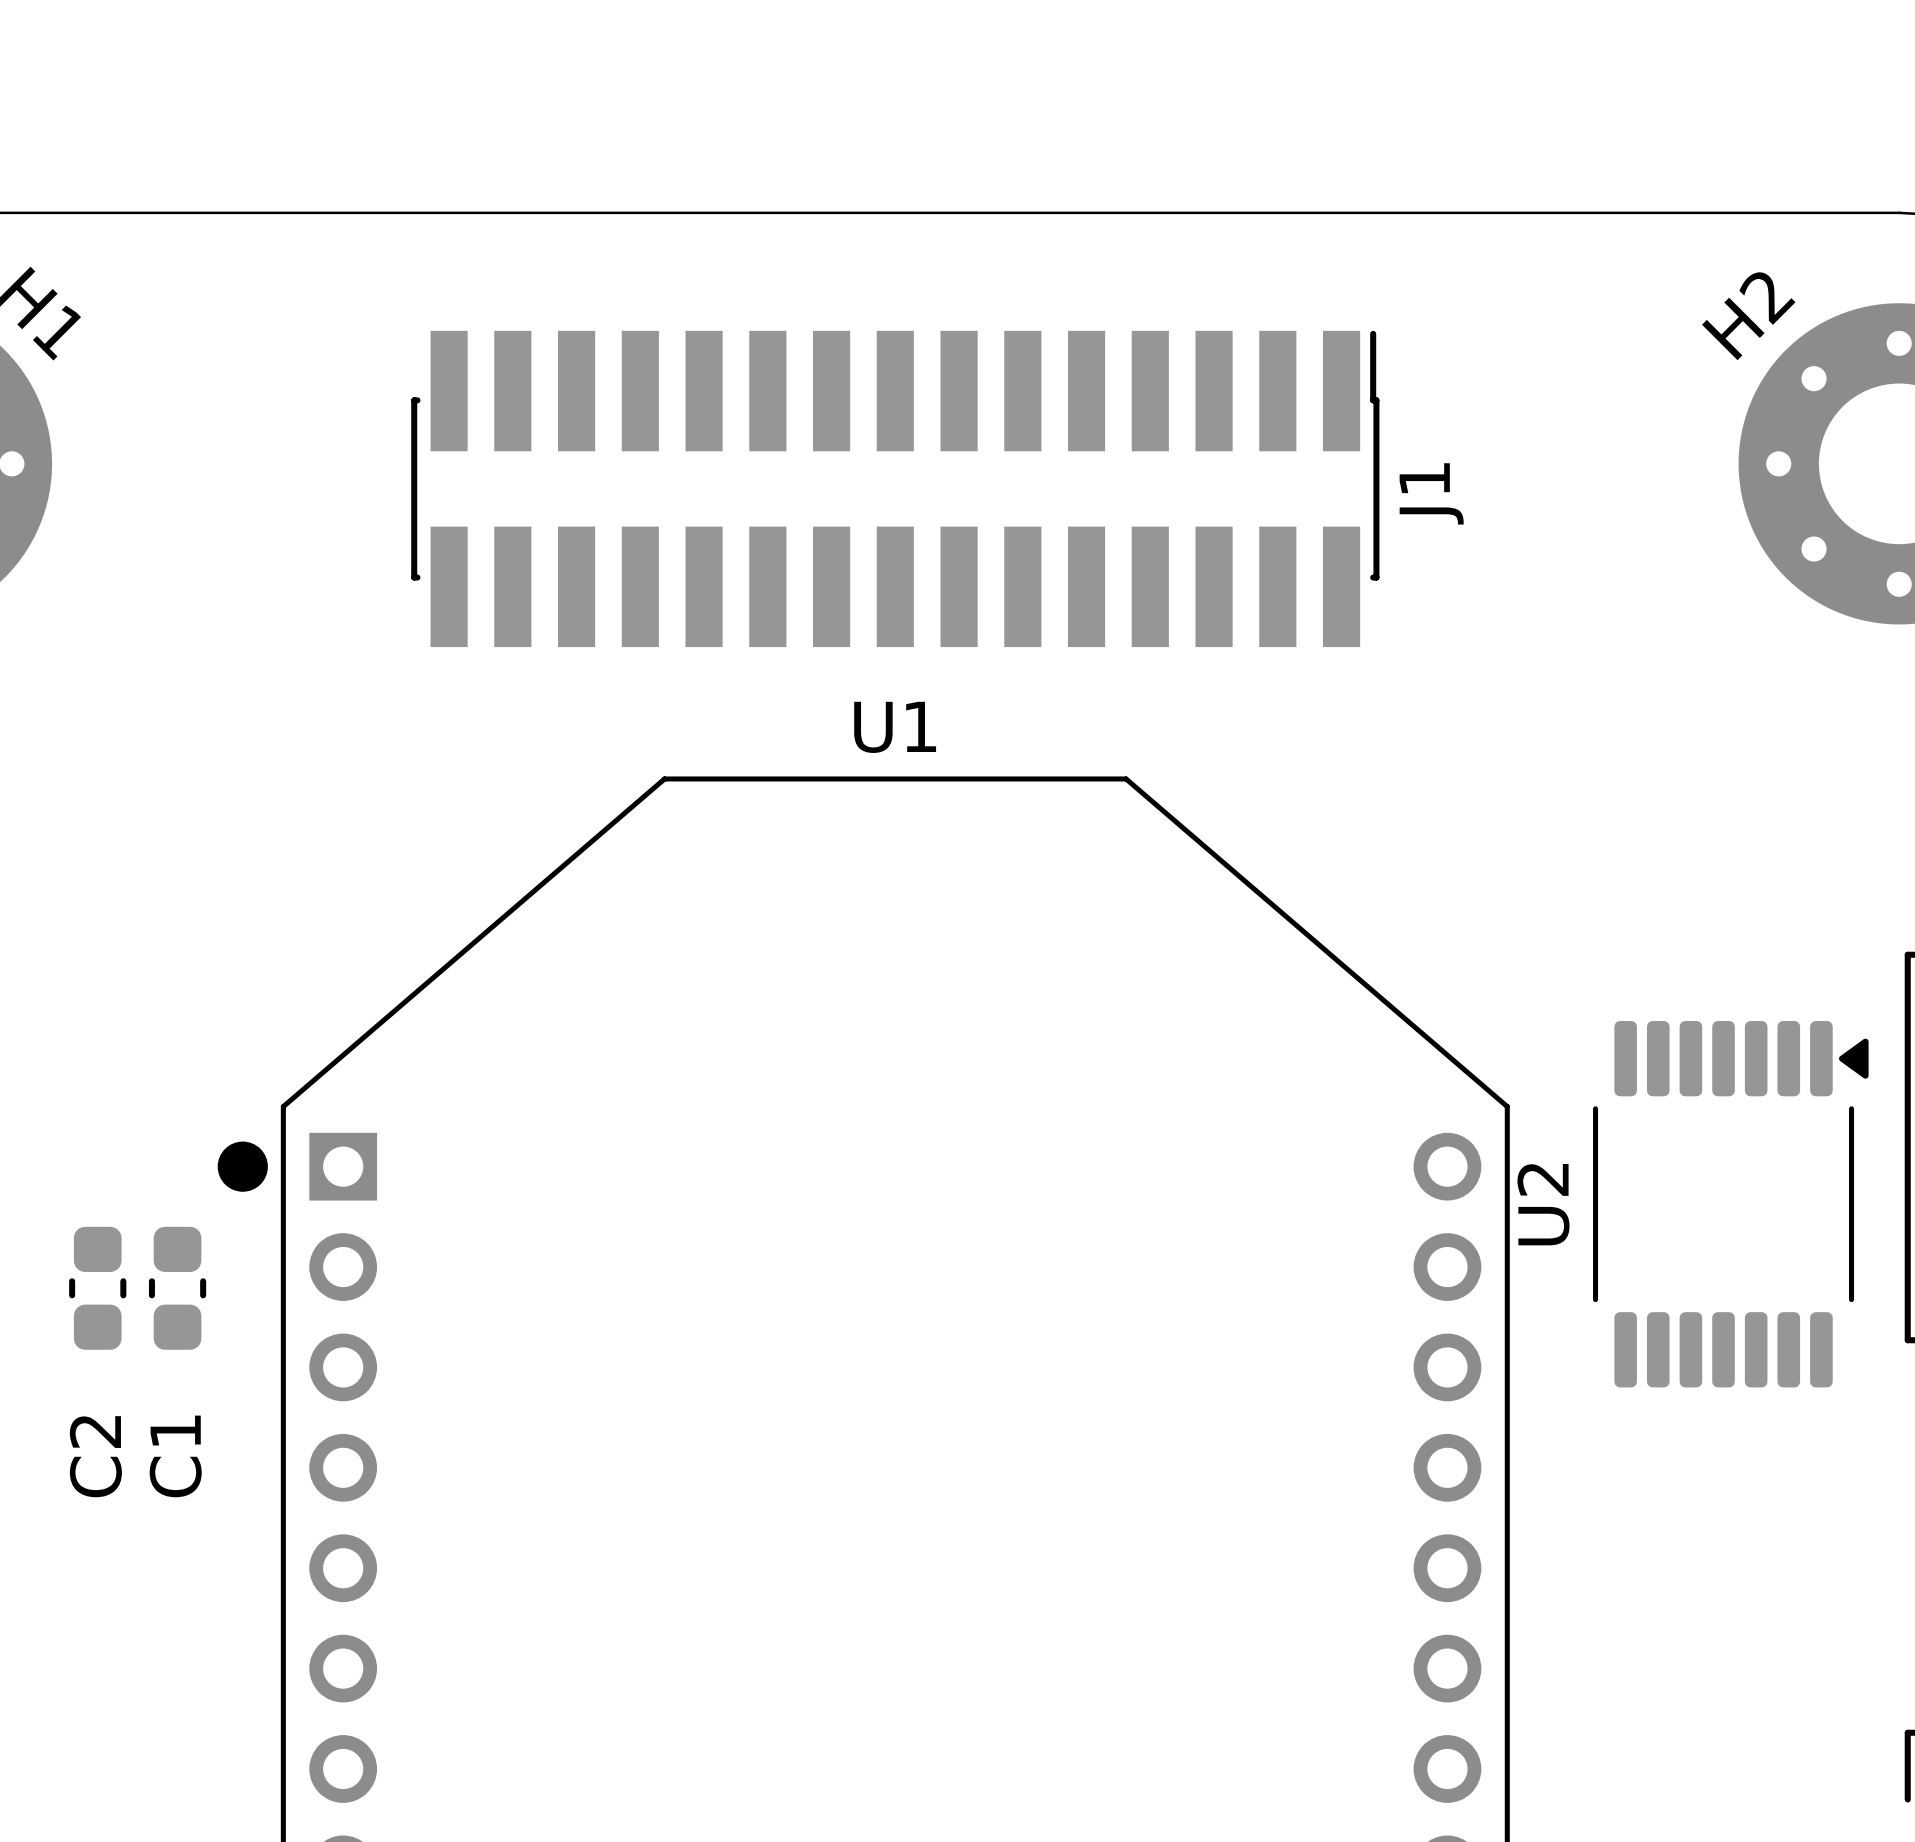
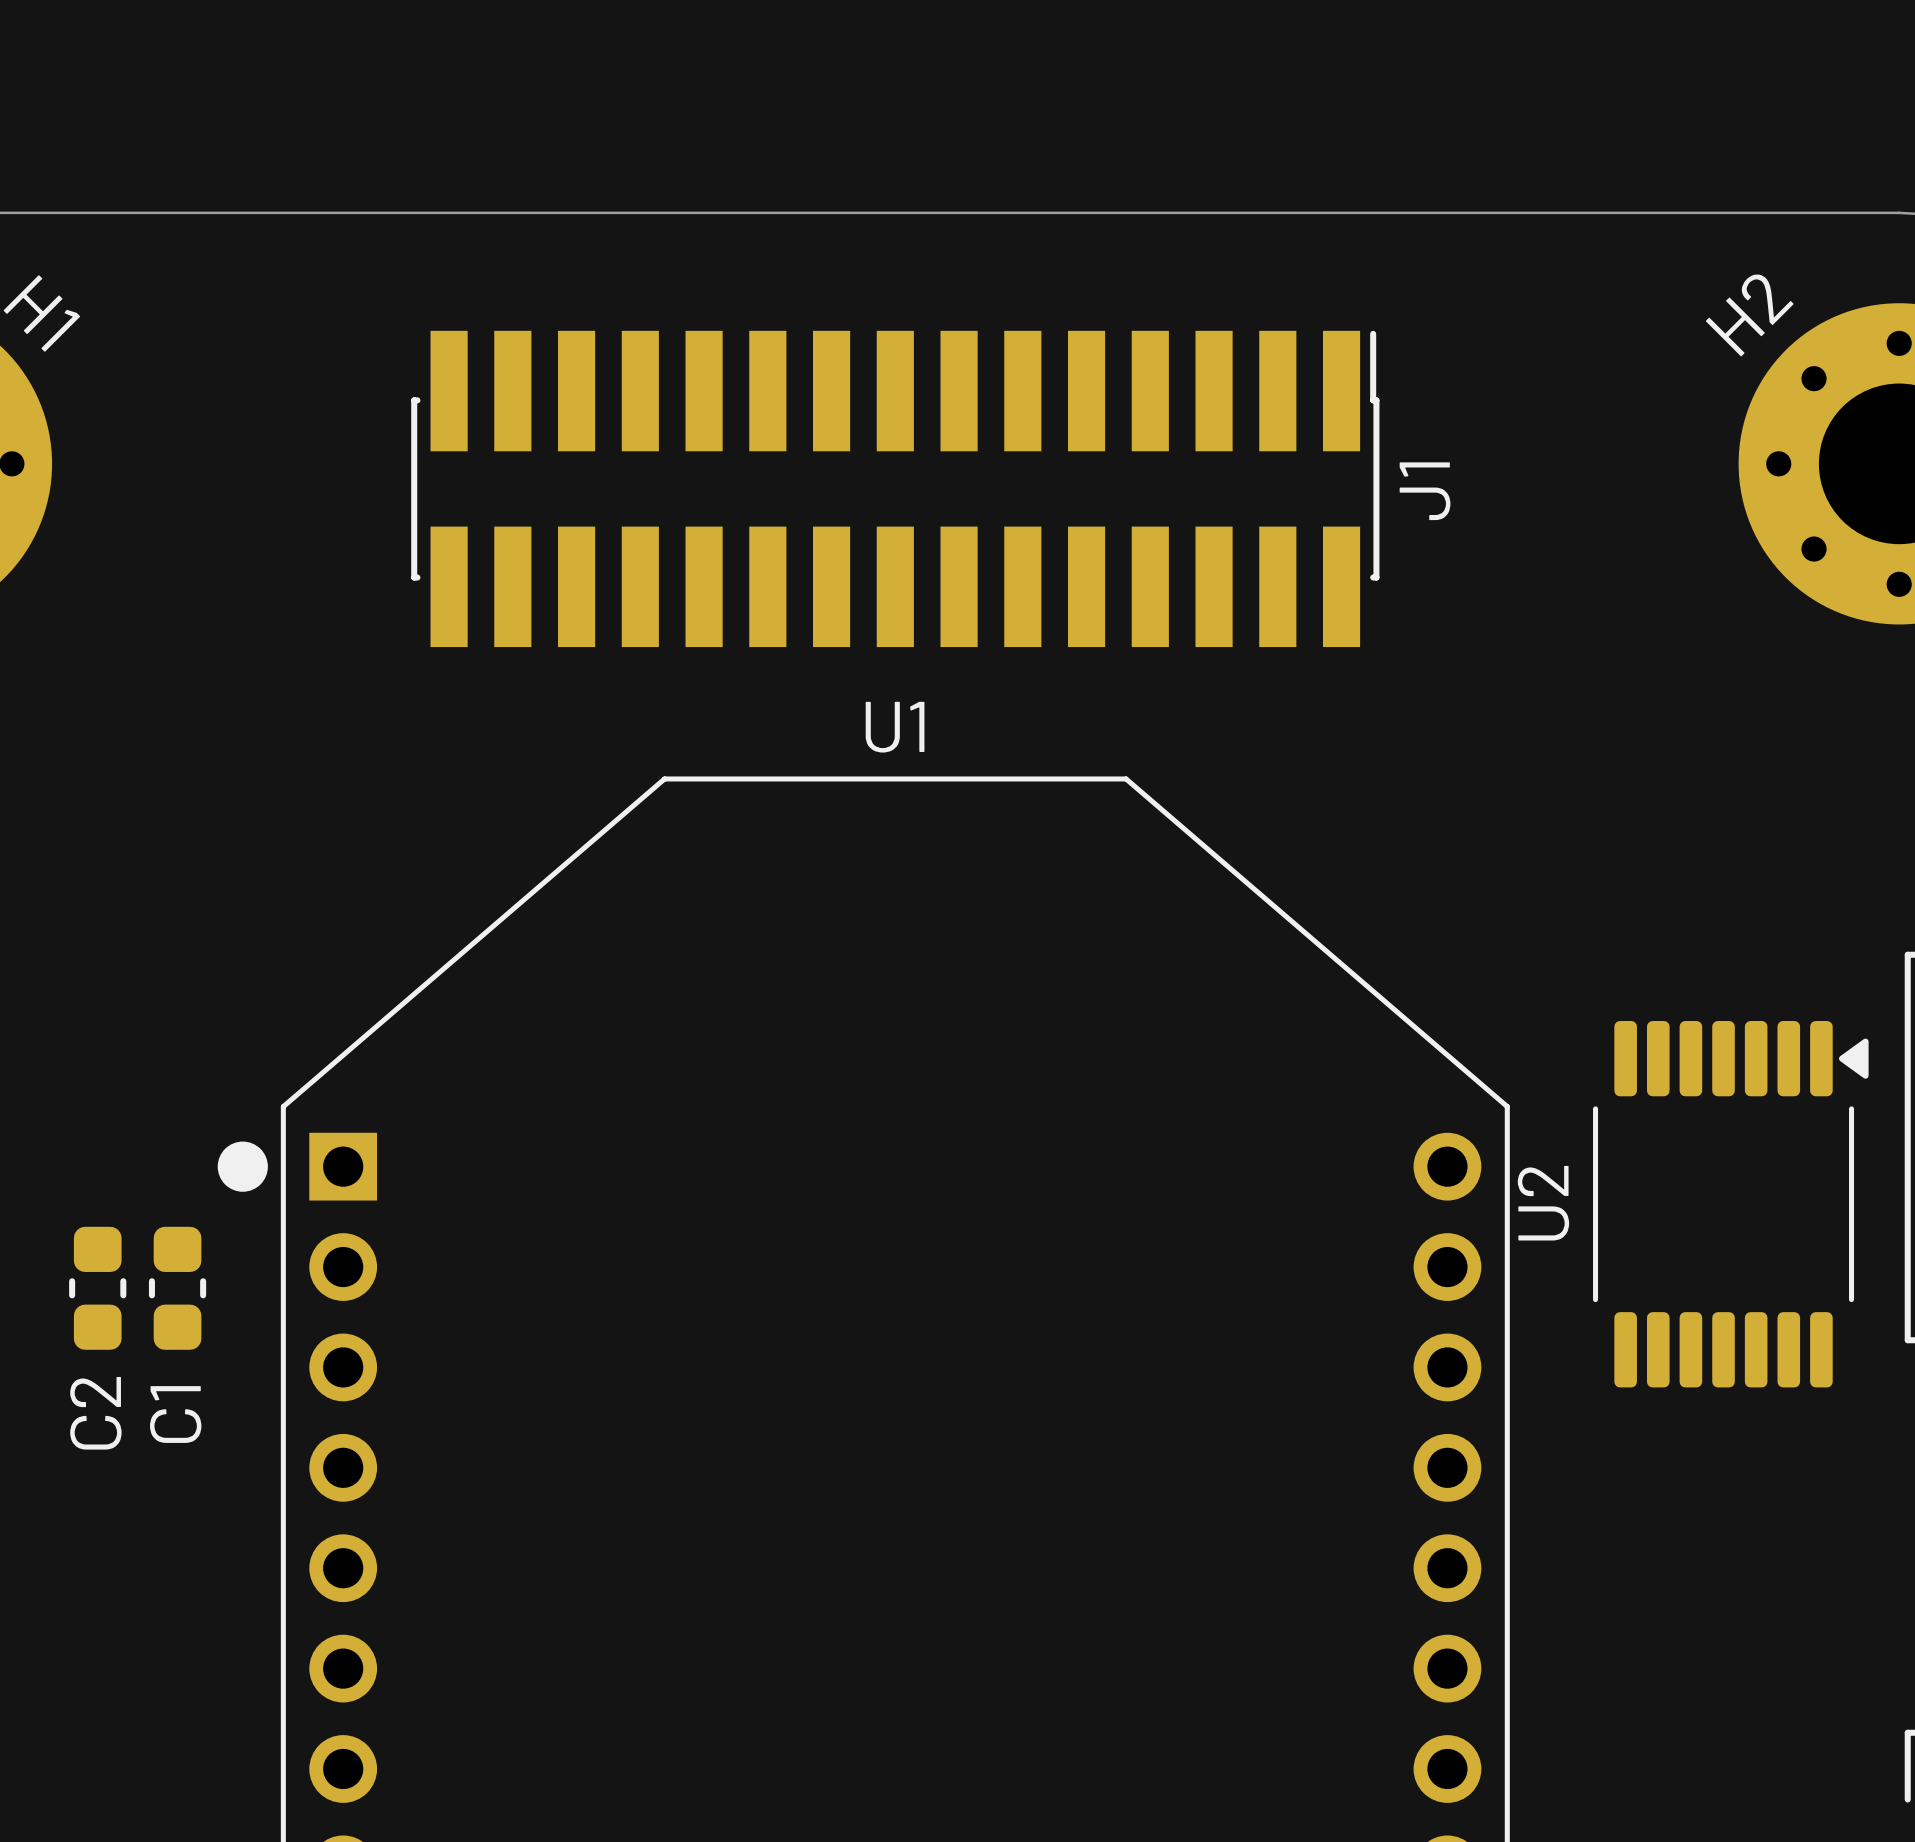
C2 name position: C2 (95, 1456) -> C2 (95, 1413)
C1 name position: C1 (175, 1456) -> C1 (175, 1414)

